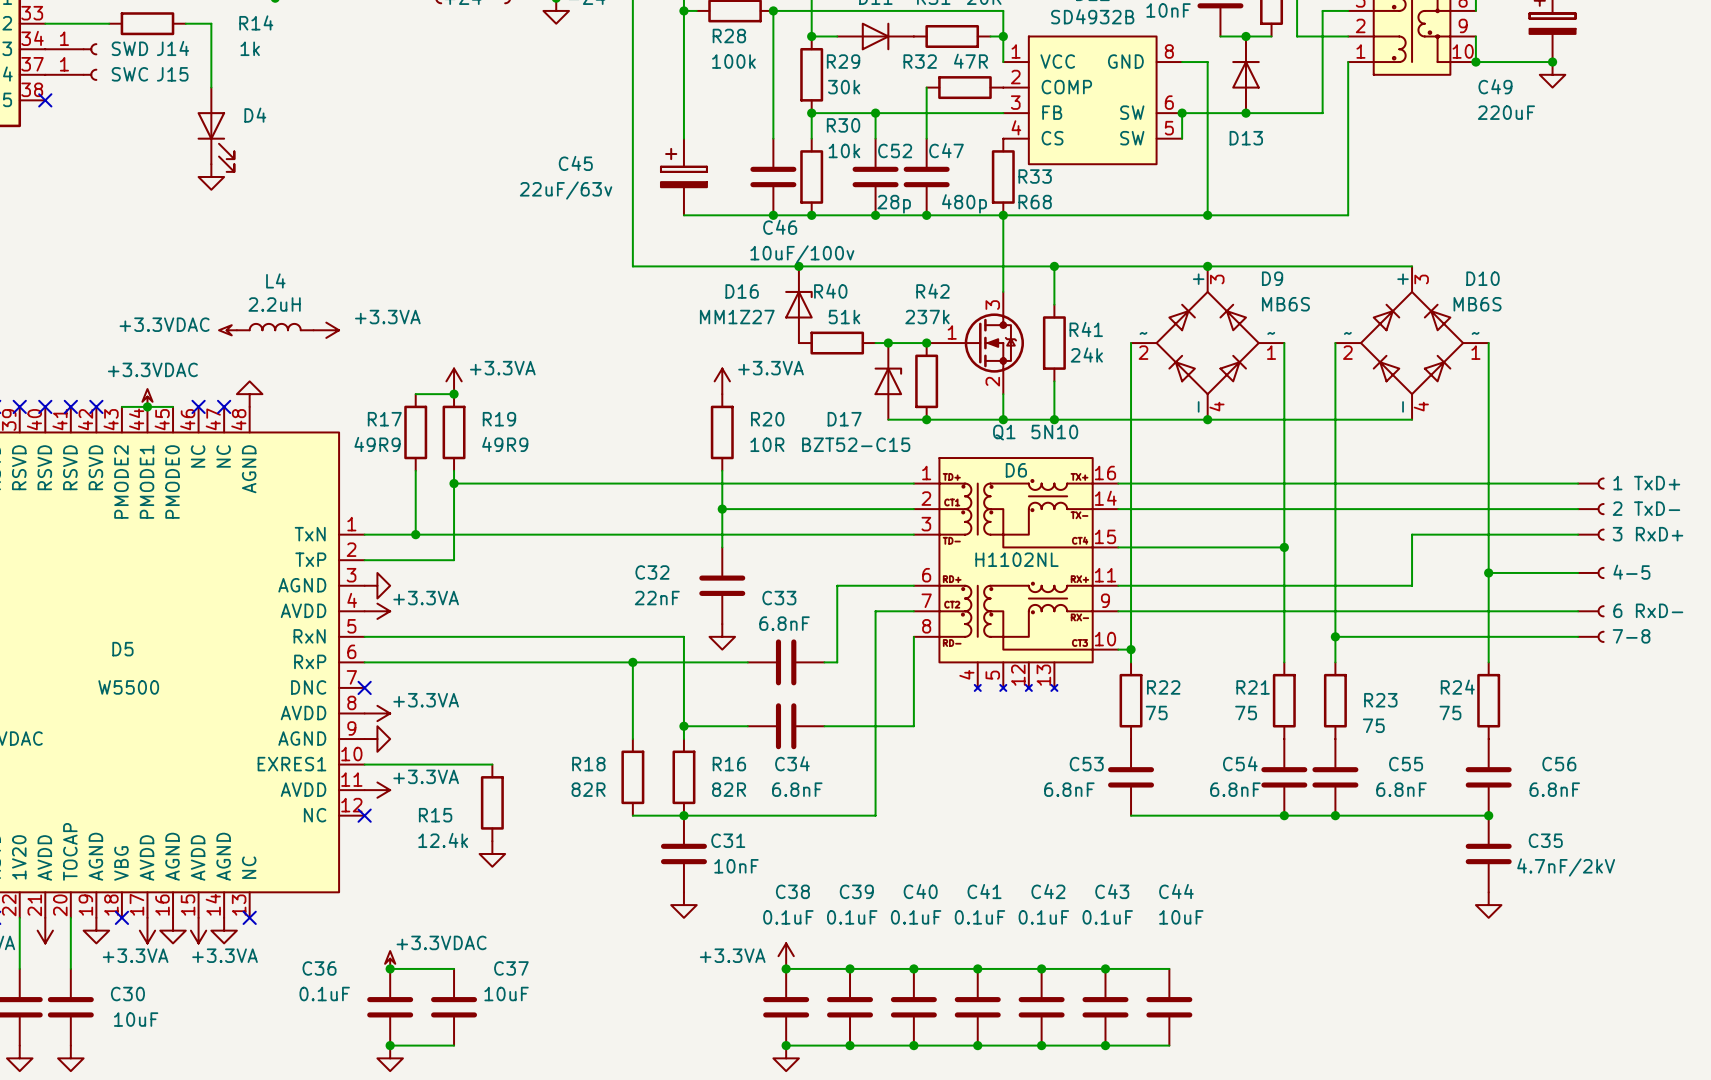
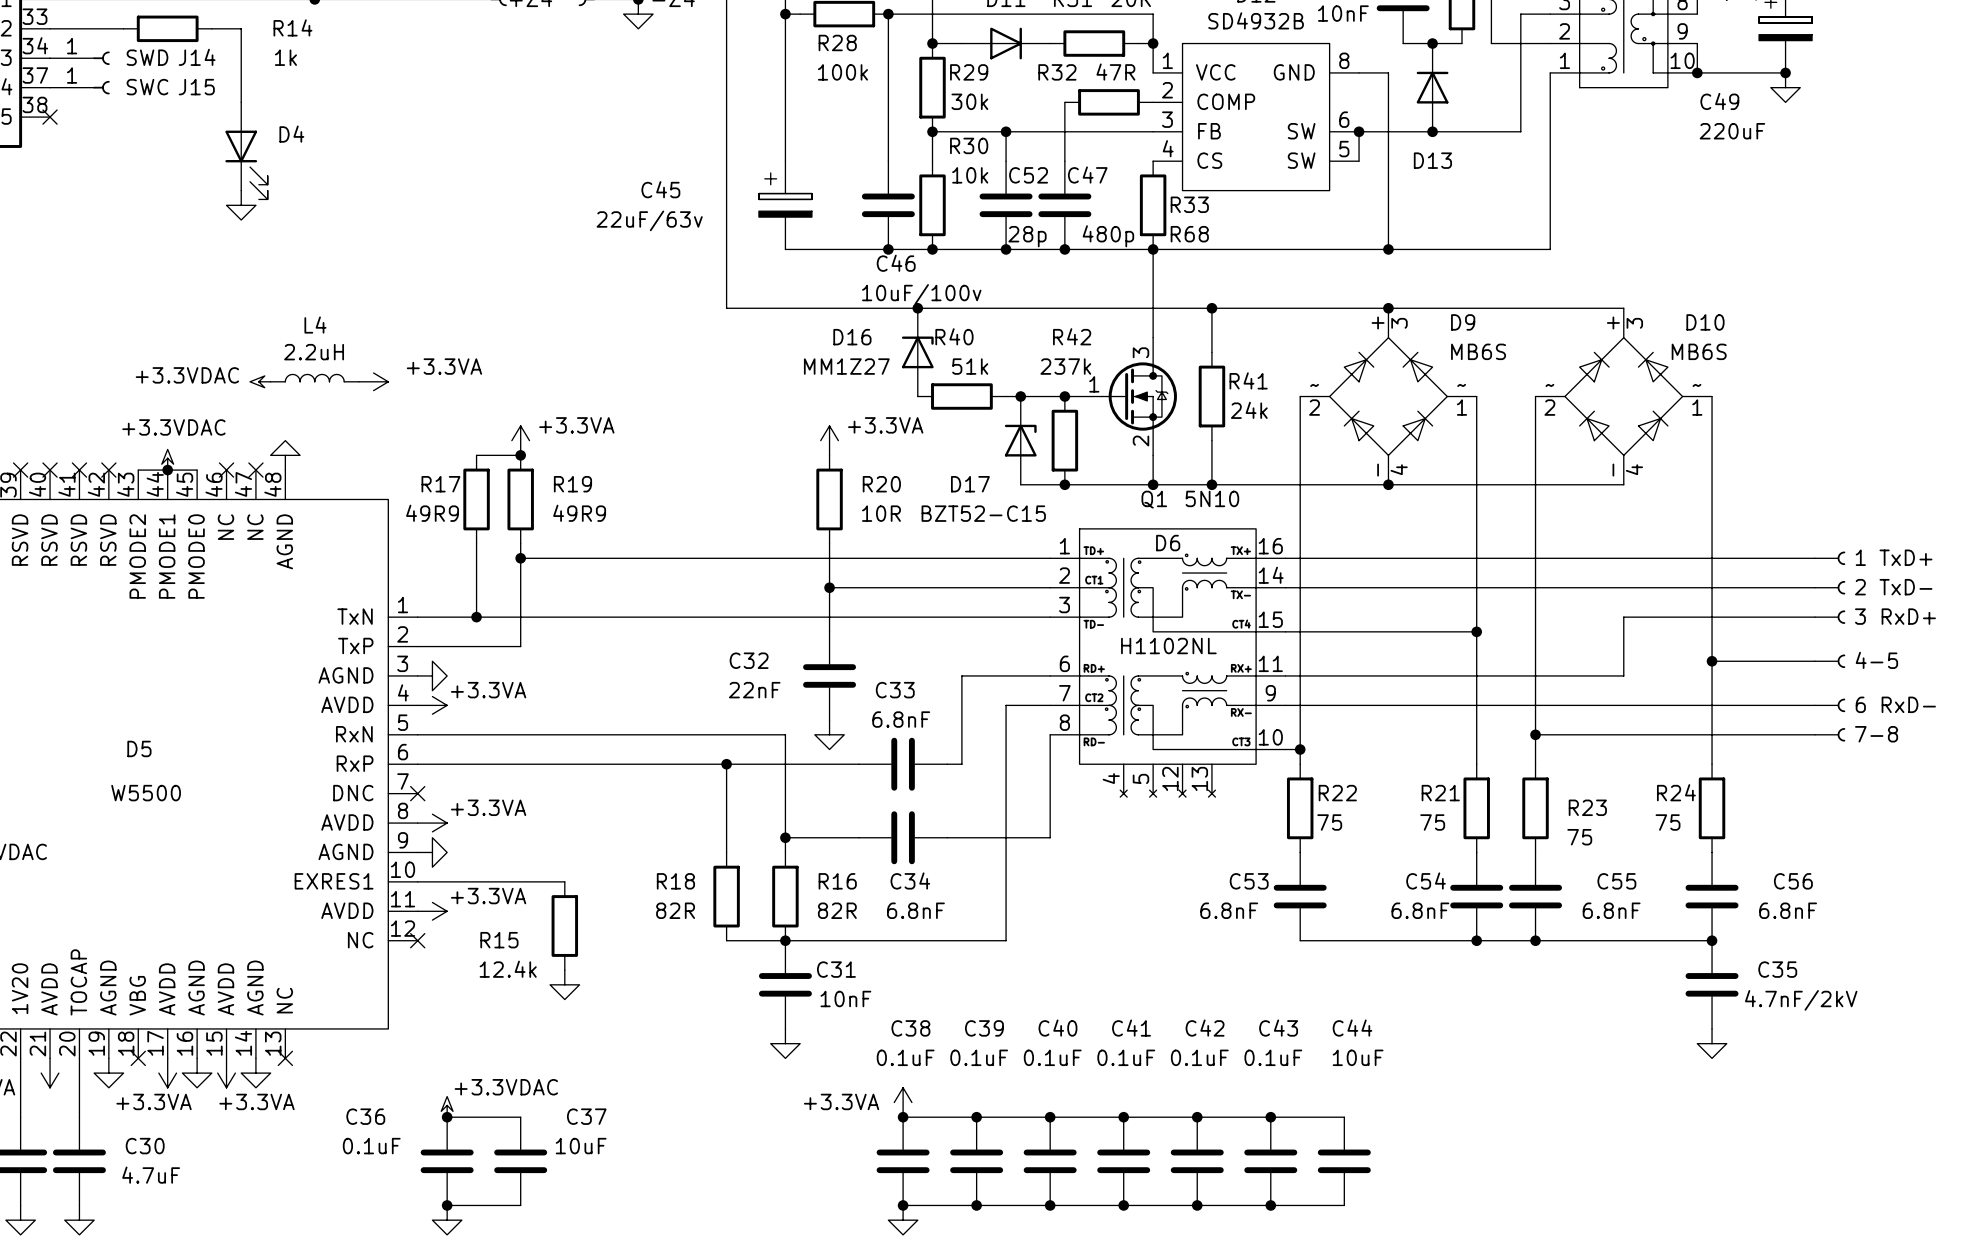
C30 value: 10uF (136, 1019) -> 4.7uF (151, 1175)

